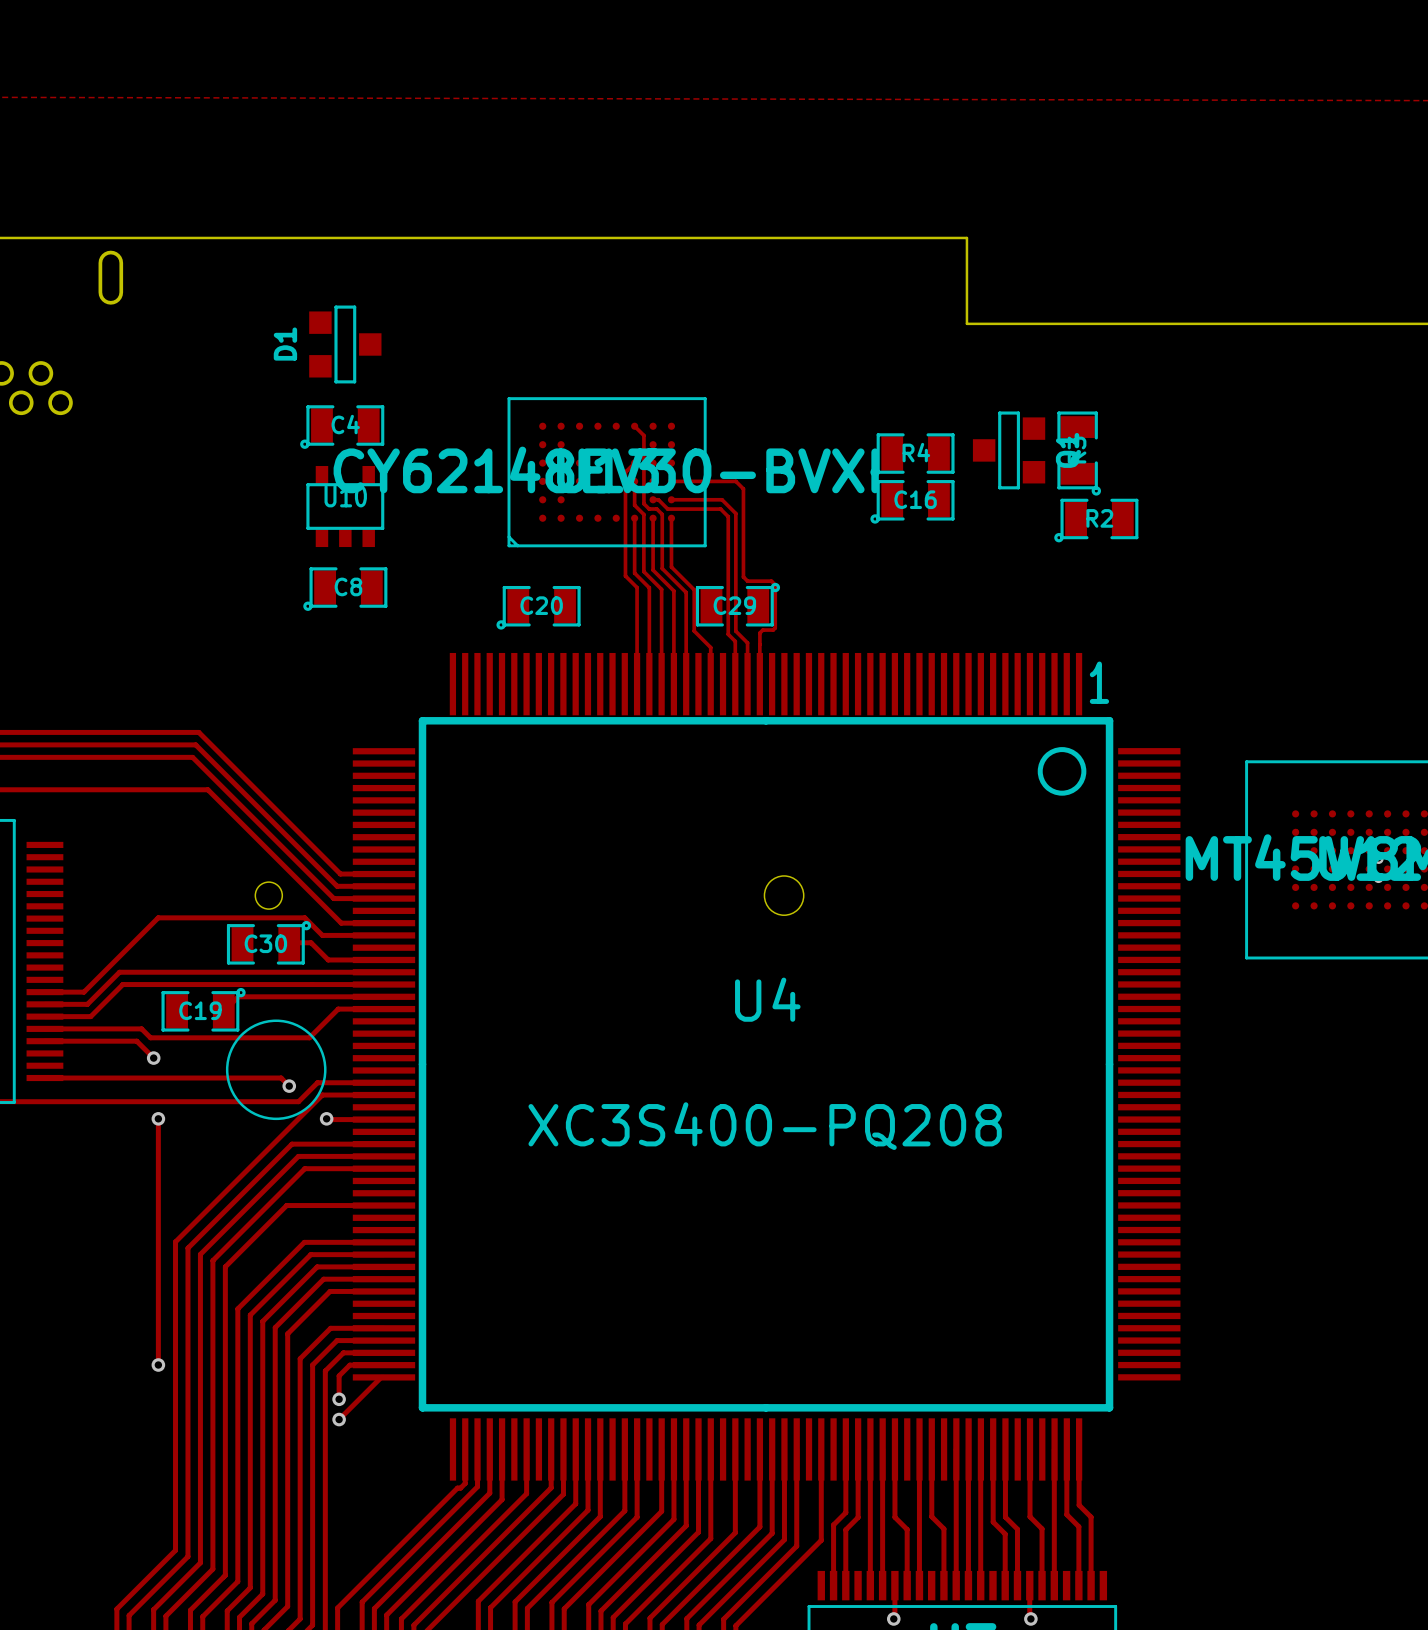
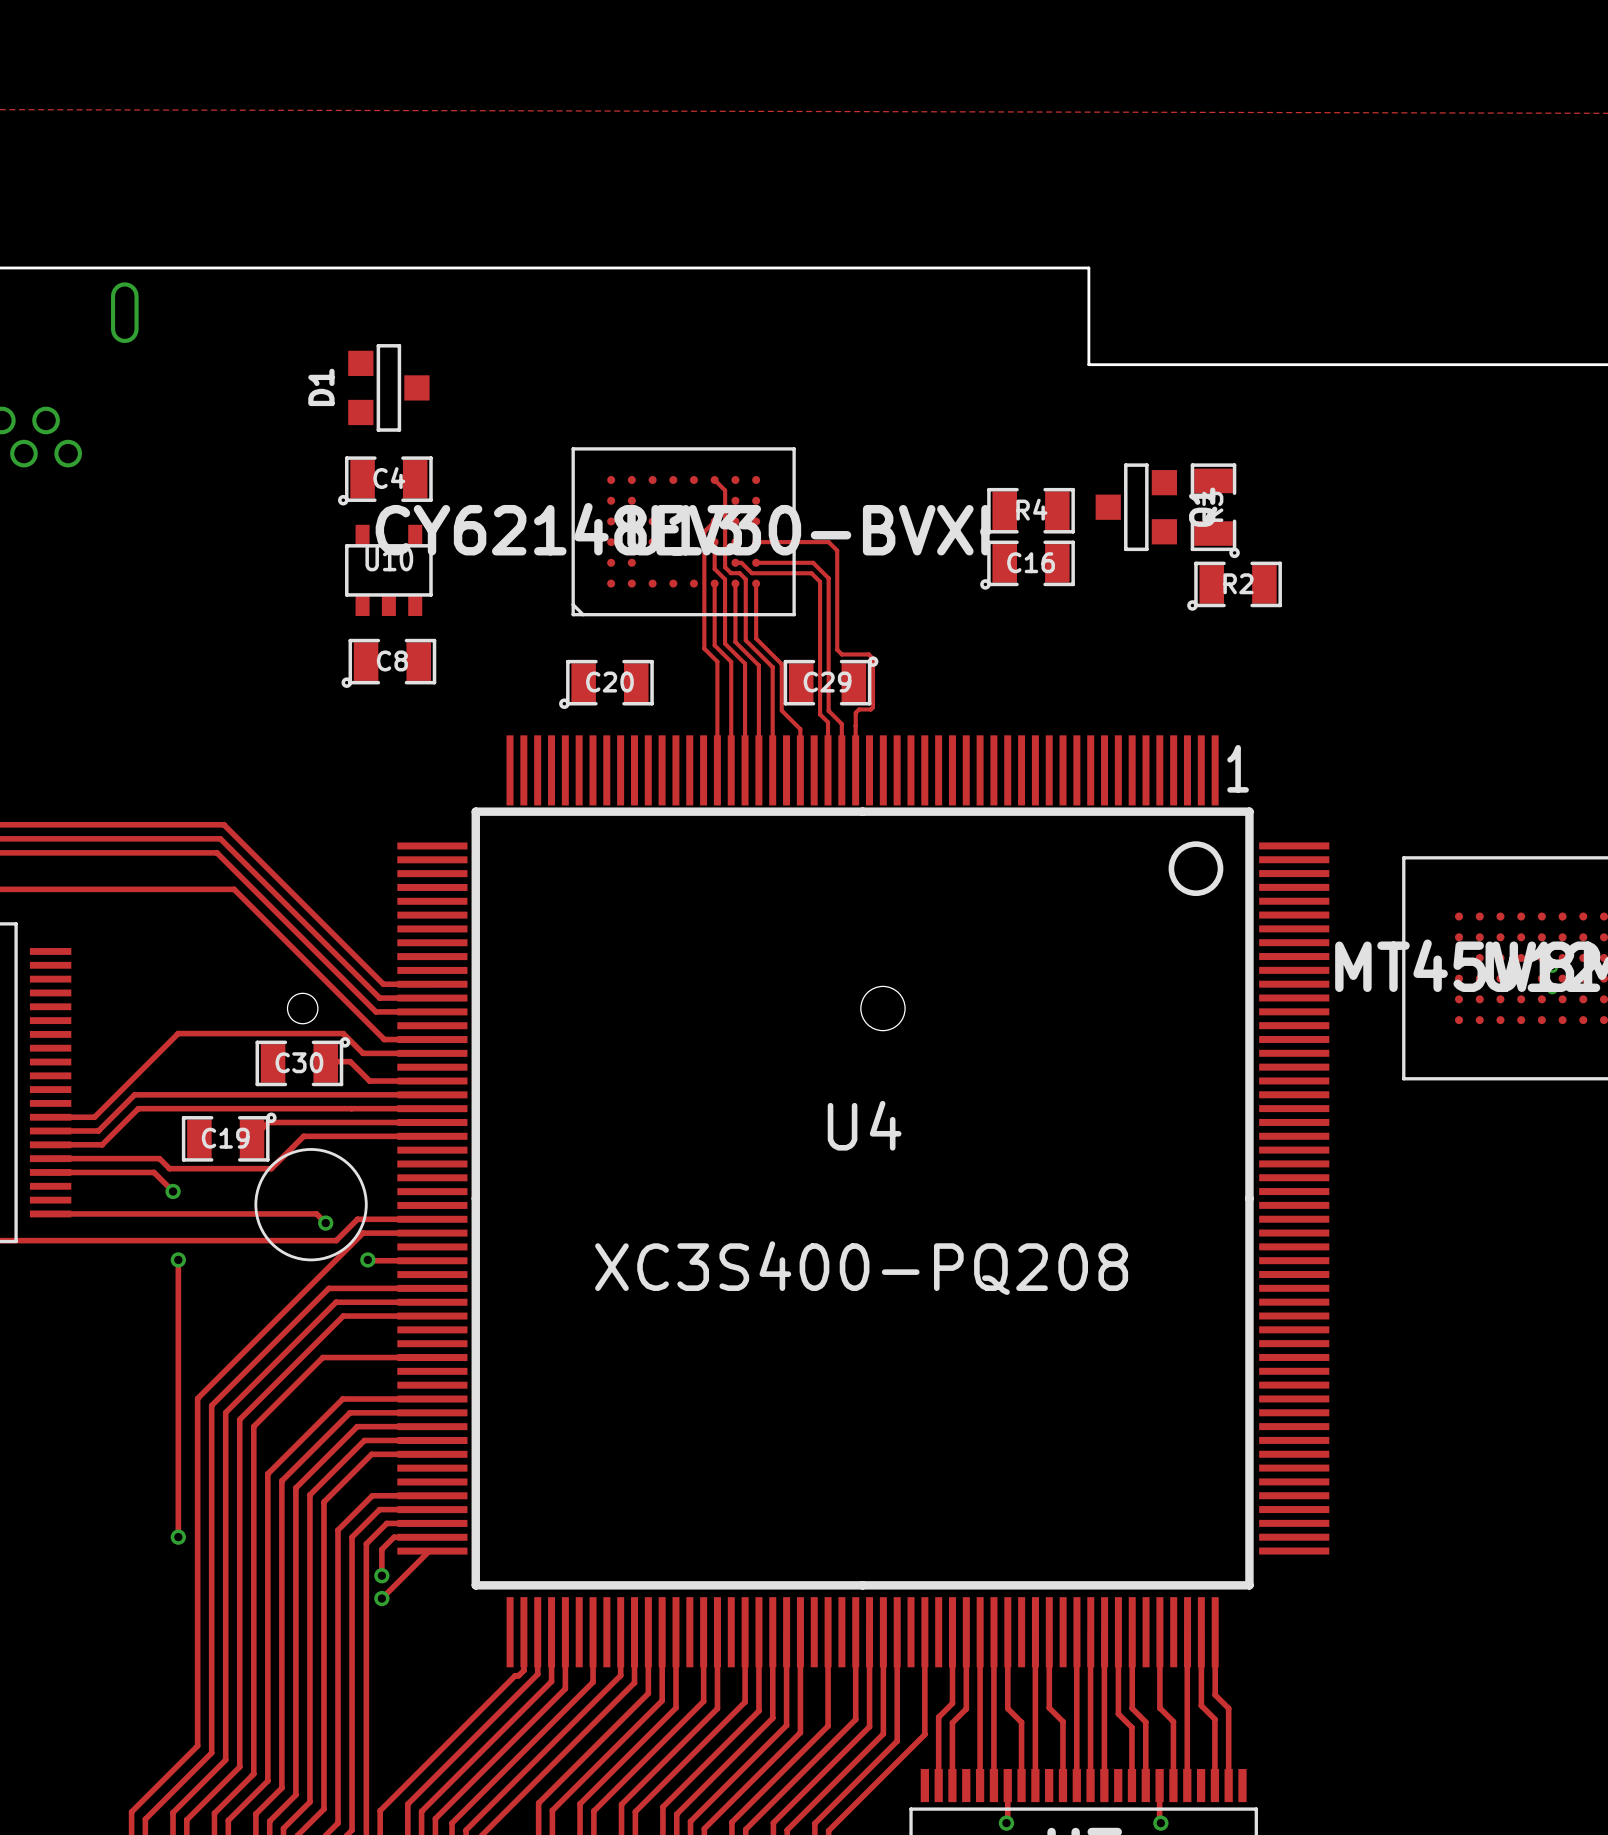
track: (338, 1009) (309, 1037) (240, 1037) -> (380, 1136) (303, 1136) (271, 1168)

